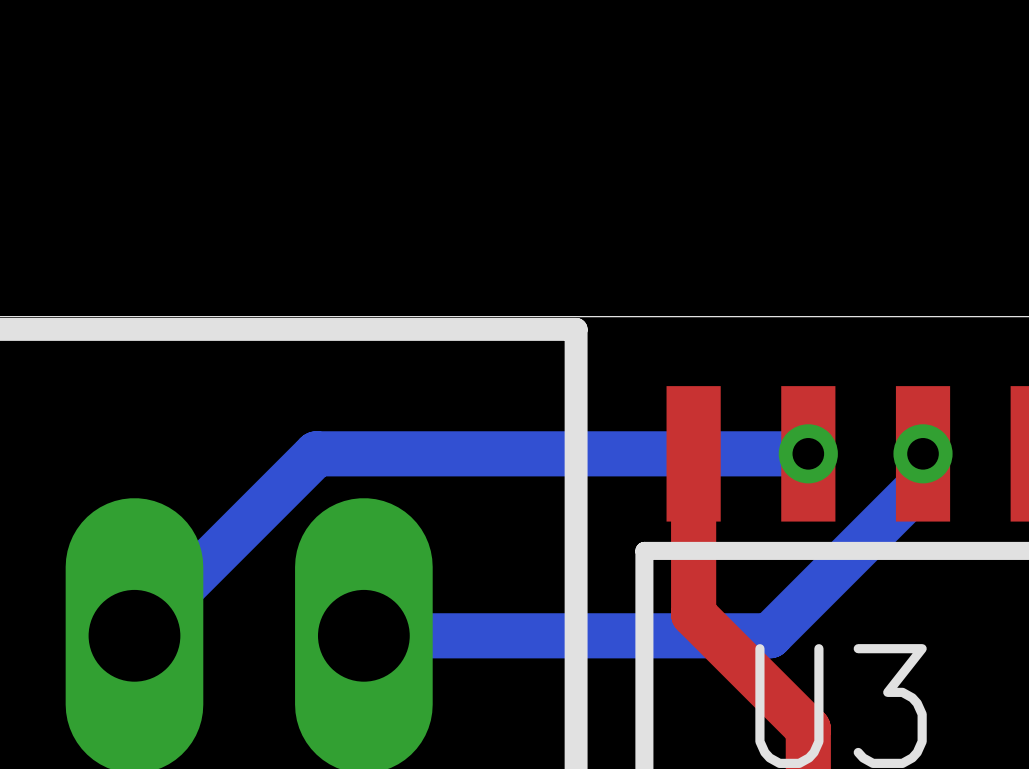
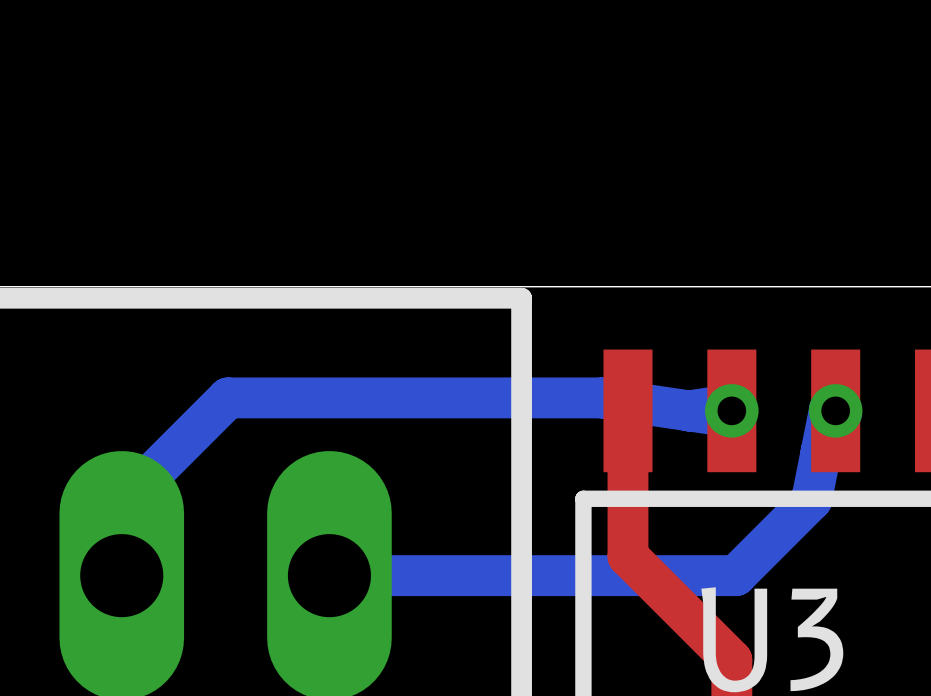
bottom track: (760, 453) (316, 453) (134, 635) -> (688, 410) (730, 404) (731, 410) (730, 417) (601, 397) (228, 397) (121, 504) (121, 575)
bottom track: (907, 498) (769, 635) -> (821, 451) (841, 413) (835, 410) (829, 409) (811, 499) (735, 575) (696, 575)

